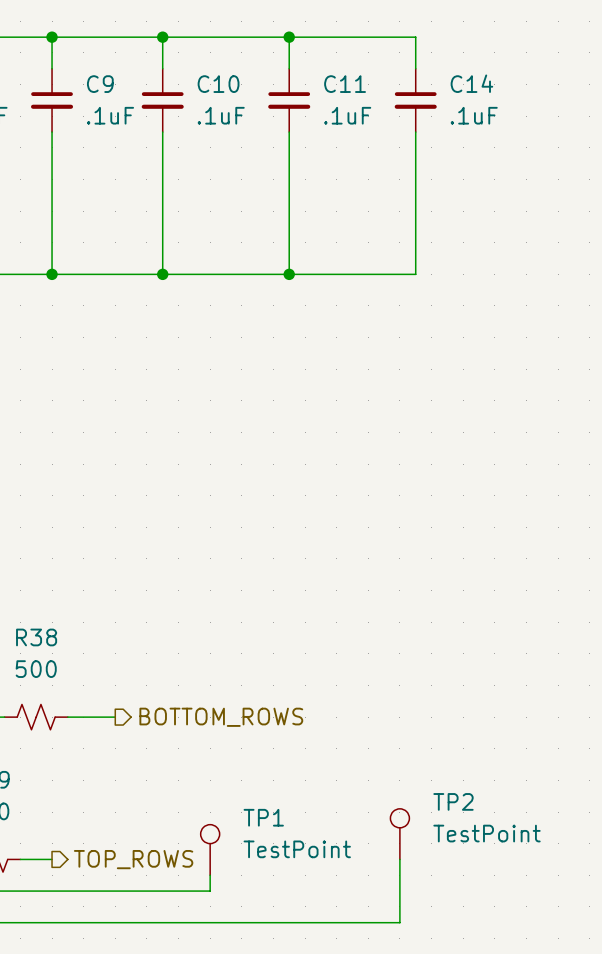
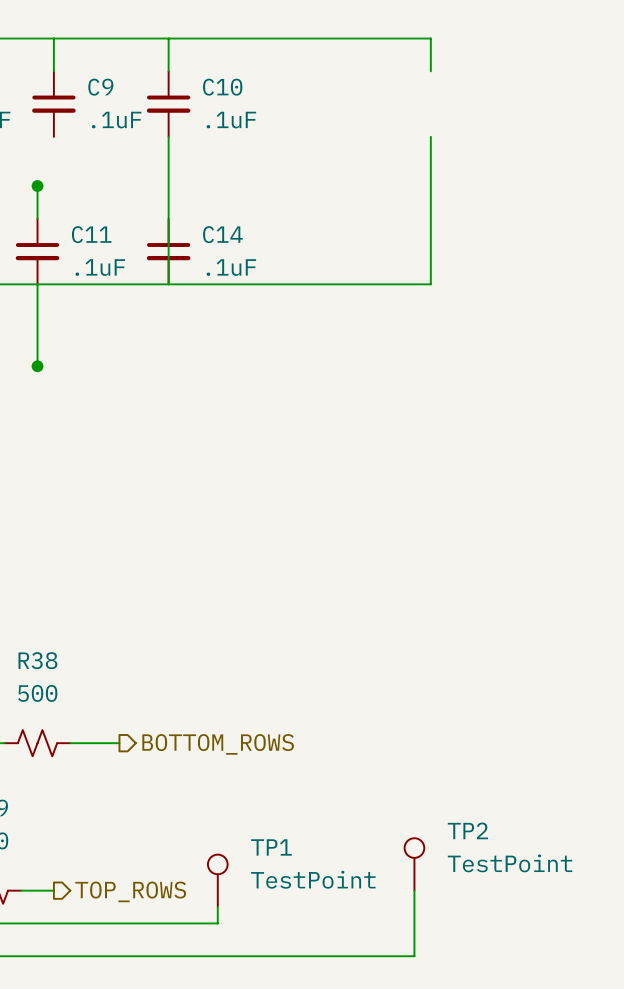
junction: (52, 37) -> none
junction: (162, 37) -> none
wire: (289, 37) (289, 68) -> (37, 186) (37, 218)
junction: (289, 37) -> none
C11 position: (289, 100) -> (37, 251)
C14 position: (415, 100) -> (168, 251)
wire: (52, 132) (52, 274) -> none
wire: (289, 132) (289, 274) -> none
junction: none -> (37, 186)
wire: none -> (37, 284) (37, 366)
junction: (52, 274) -> none
junction: (162, 274) -> none
junction: (289, 274) -> none
junction: none -> (37, 366)

